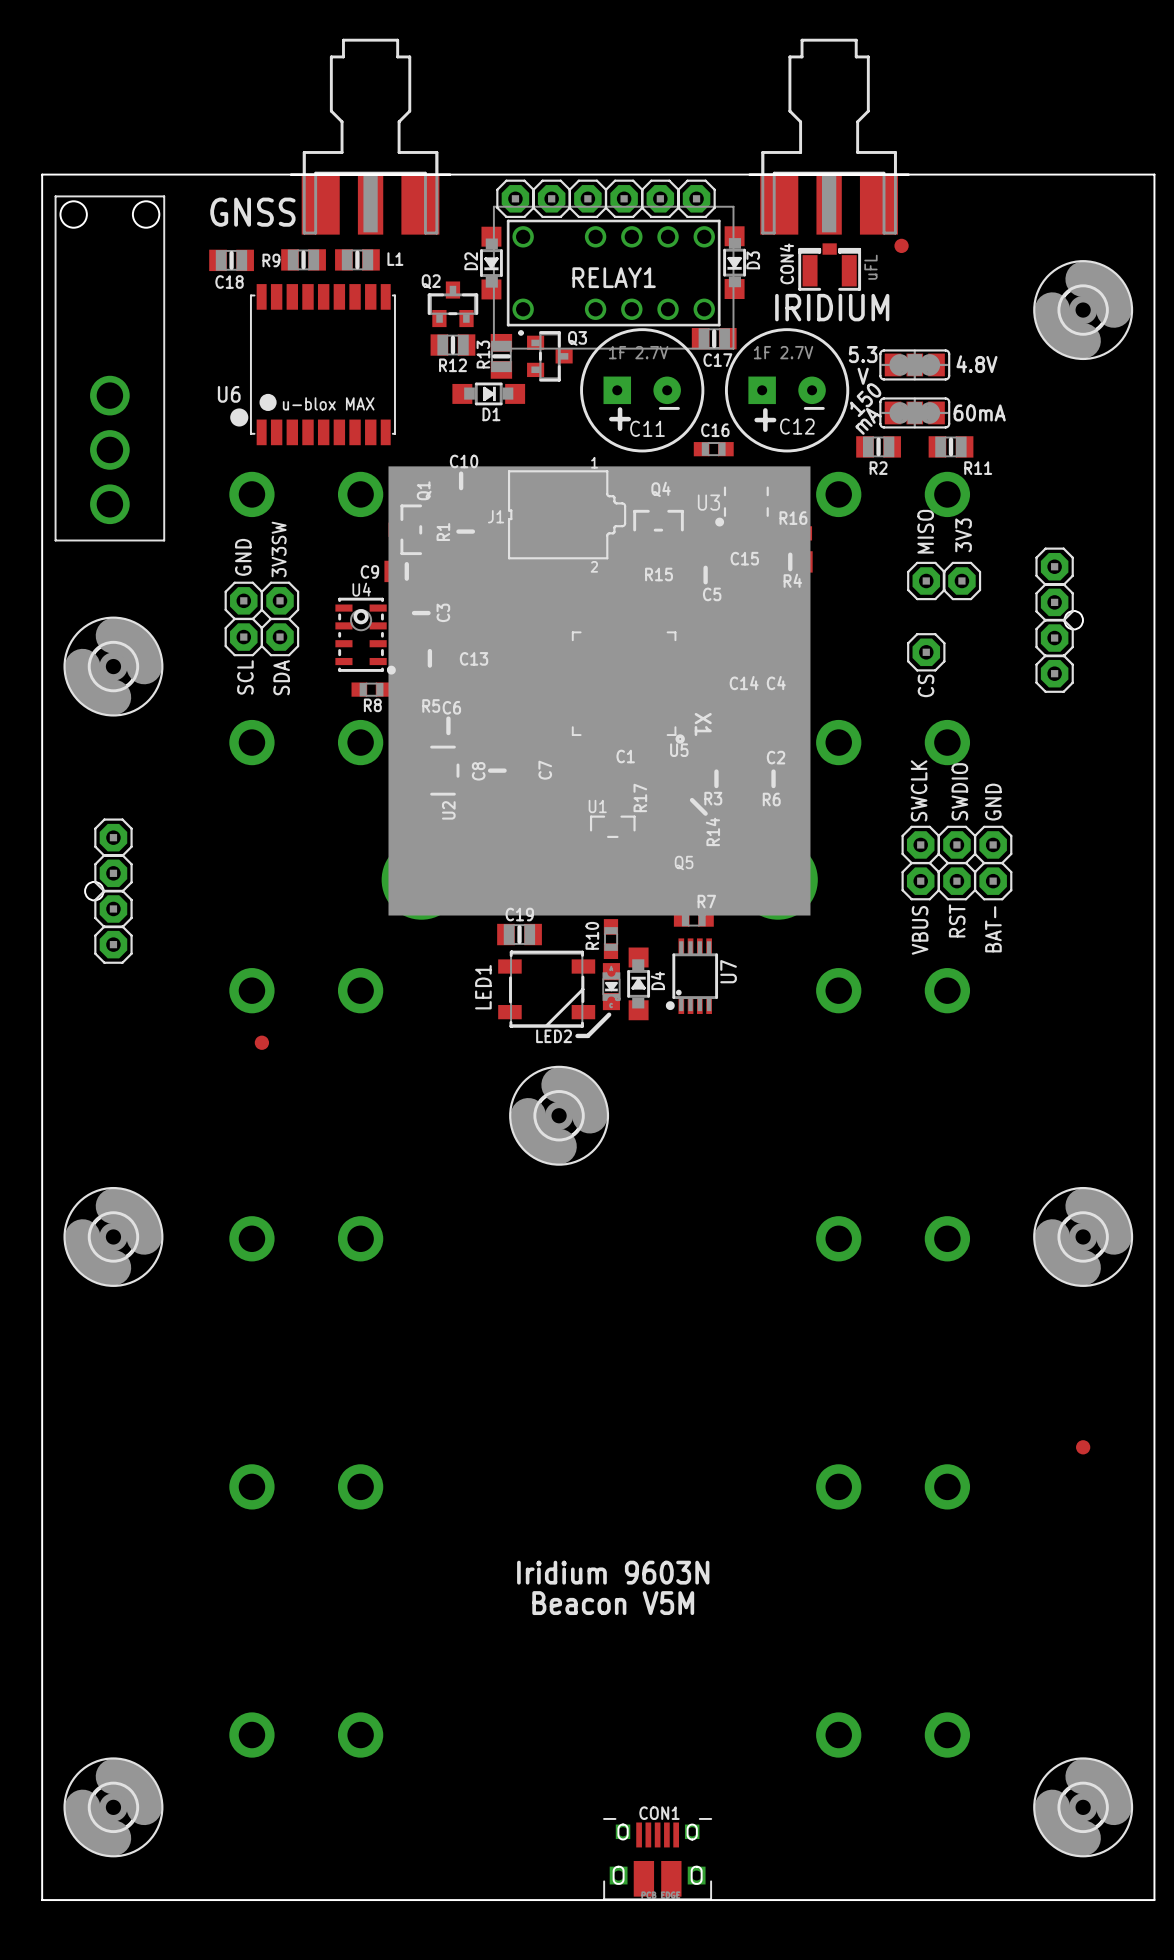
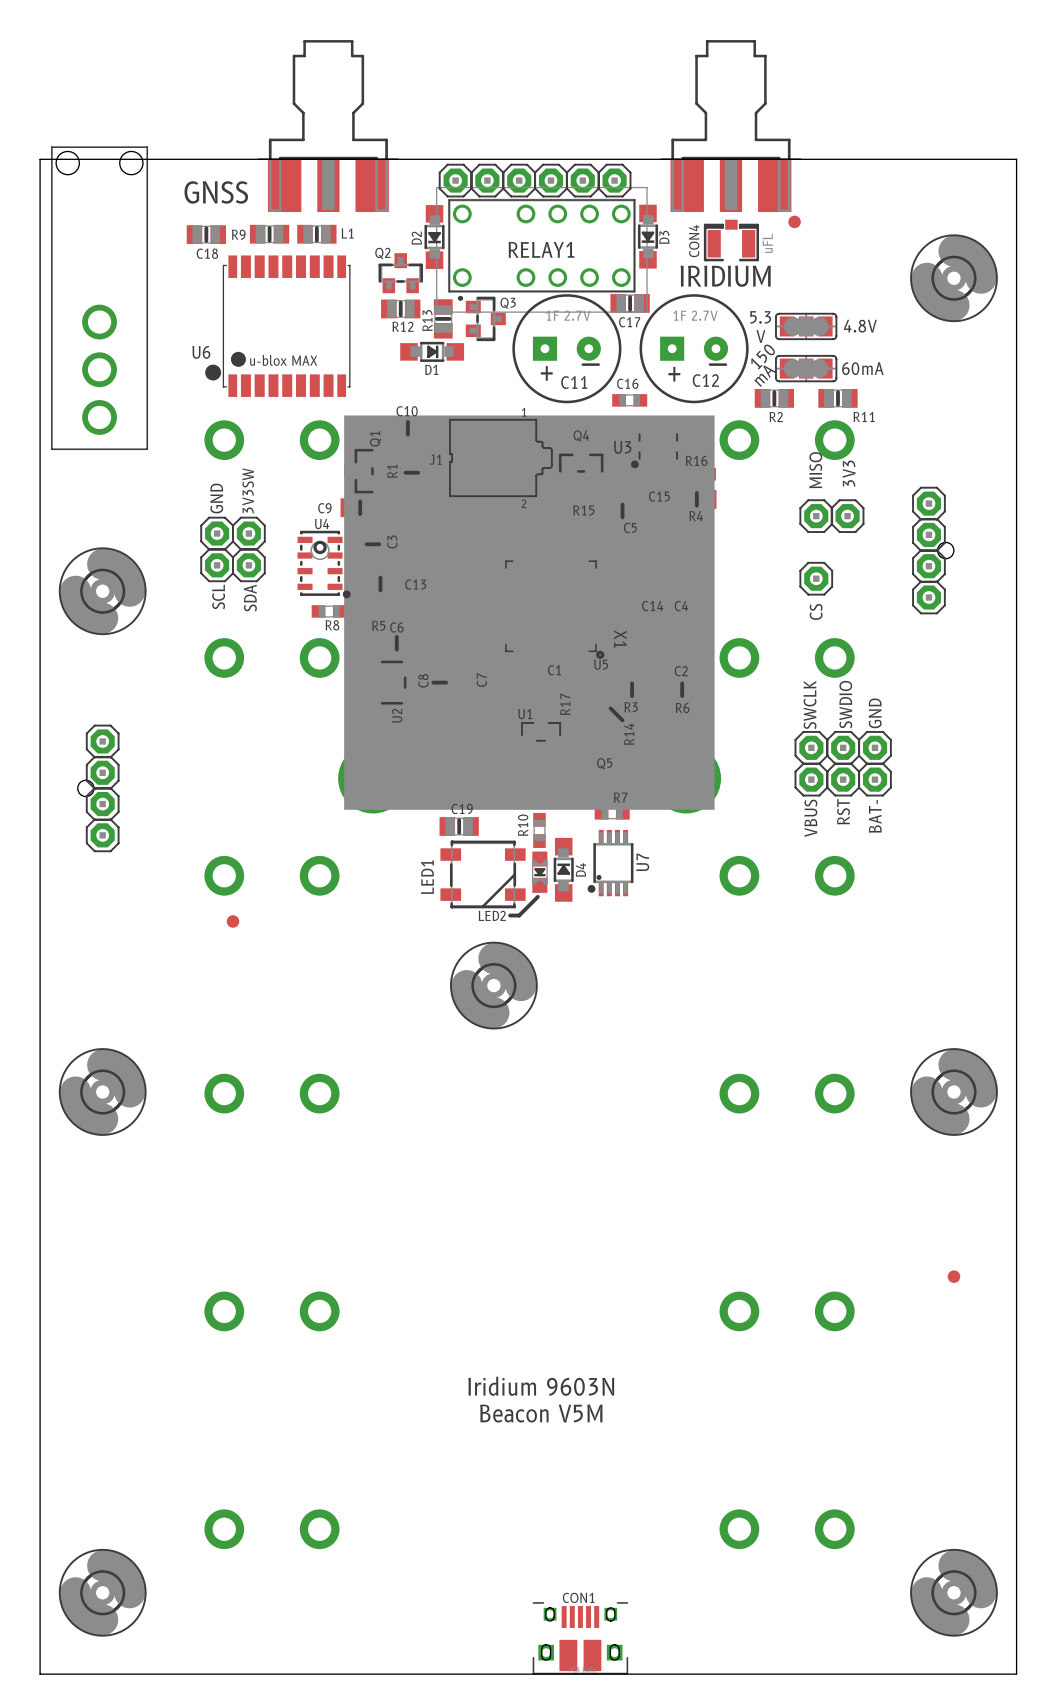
part position: (109, 368) -> (99, 298)

